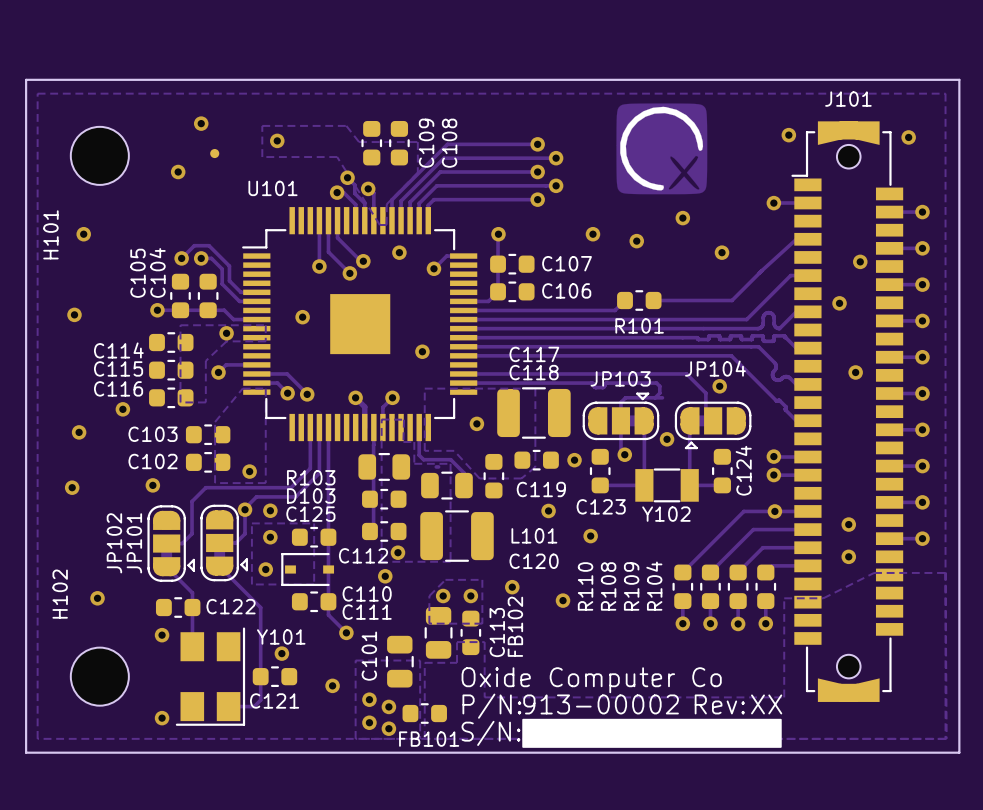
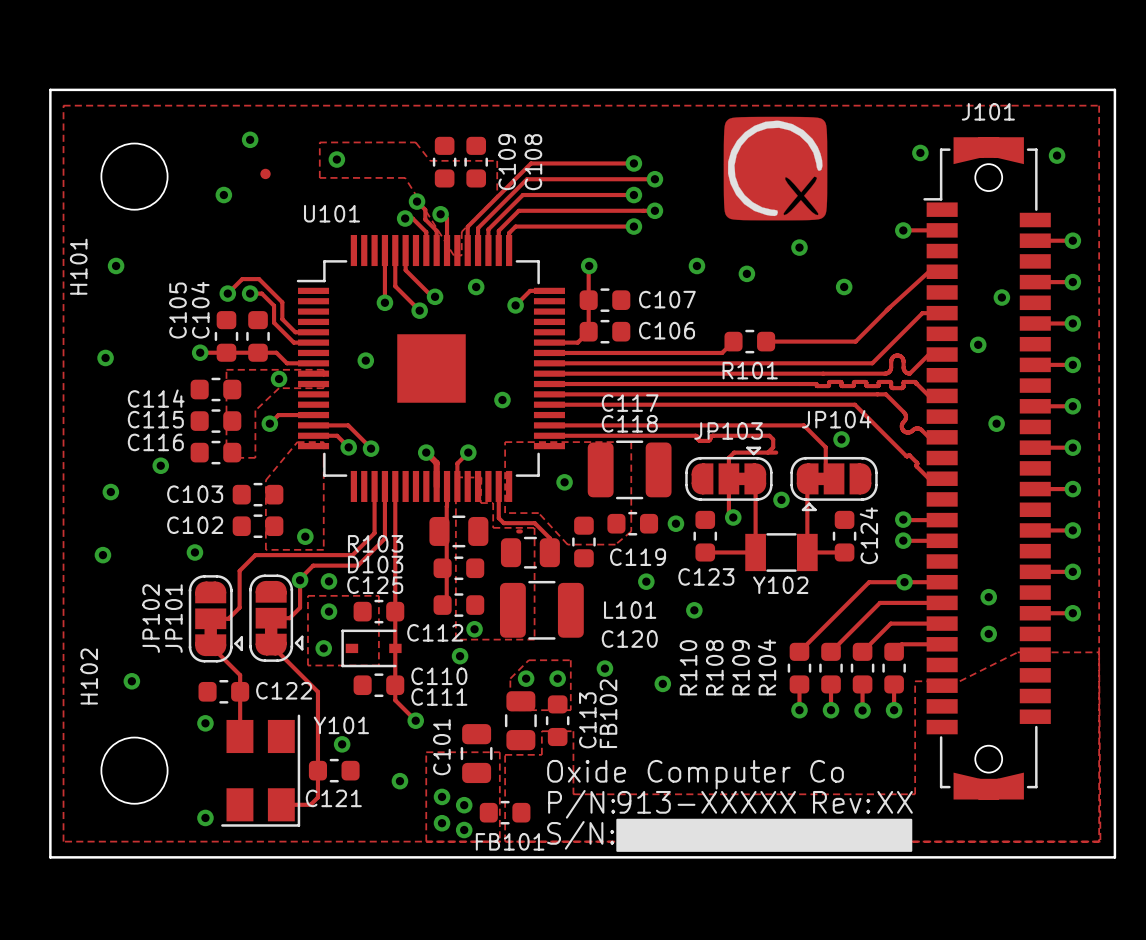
drawing shape: [461, 667, 783, 748] -> [547, 759, 913, 852]

